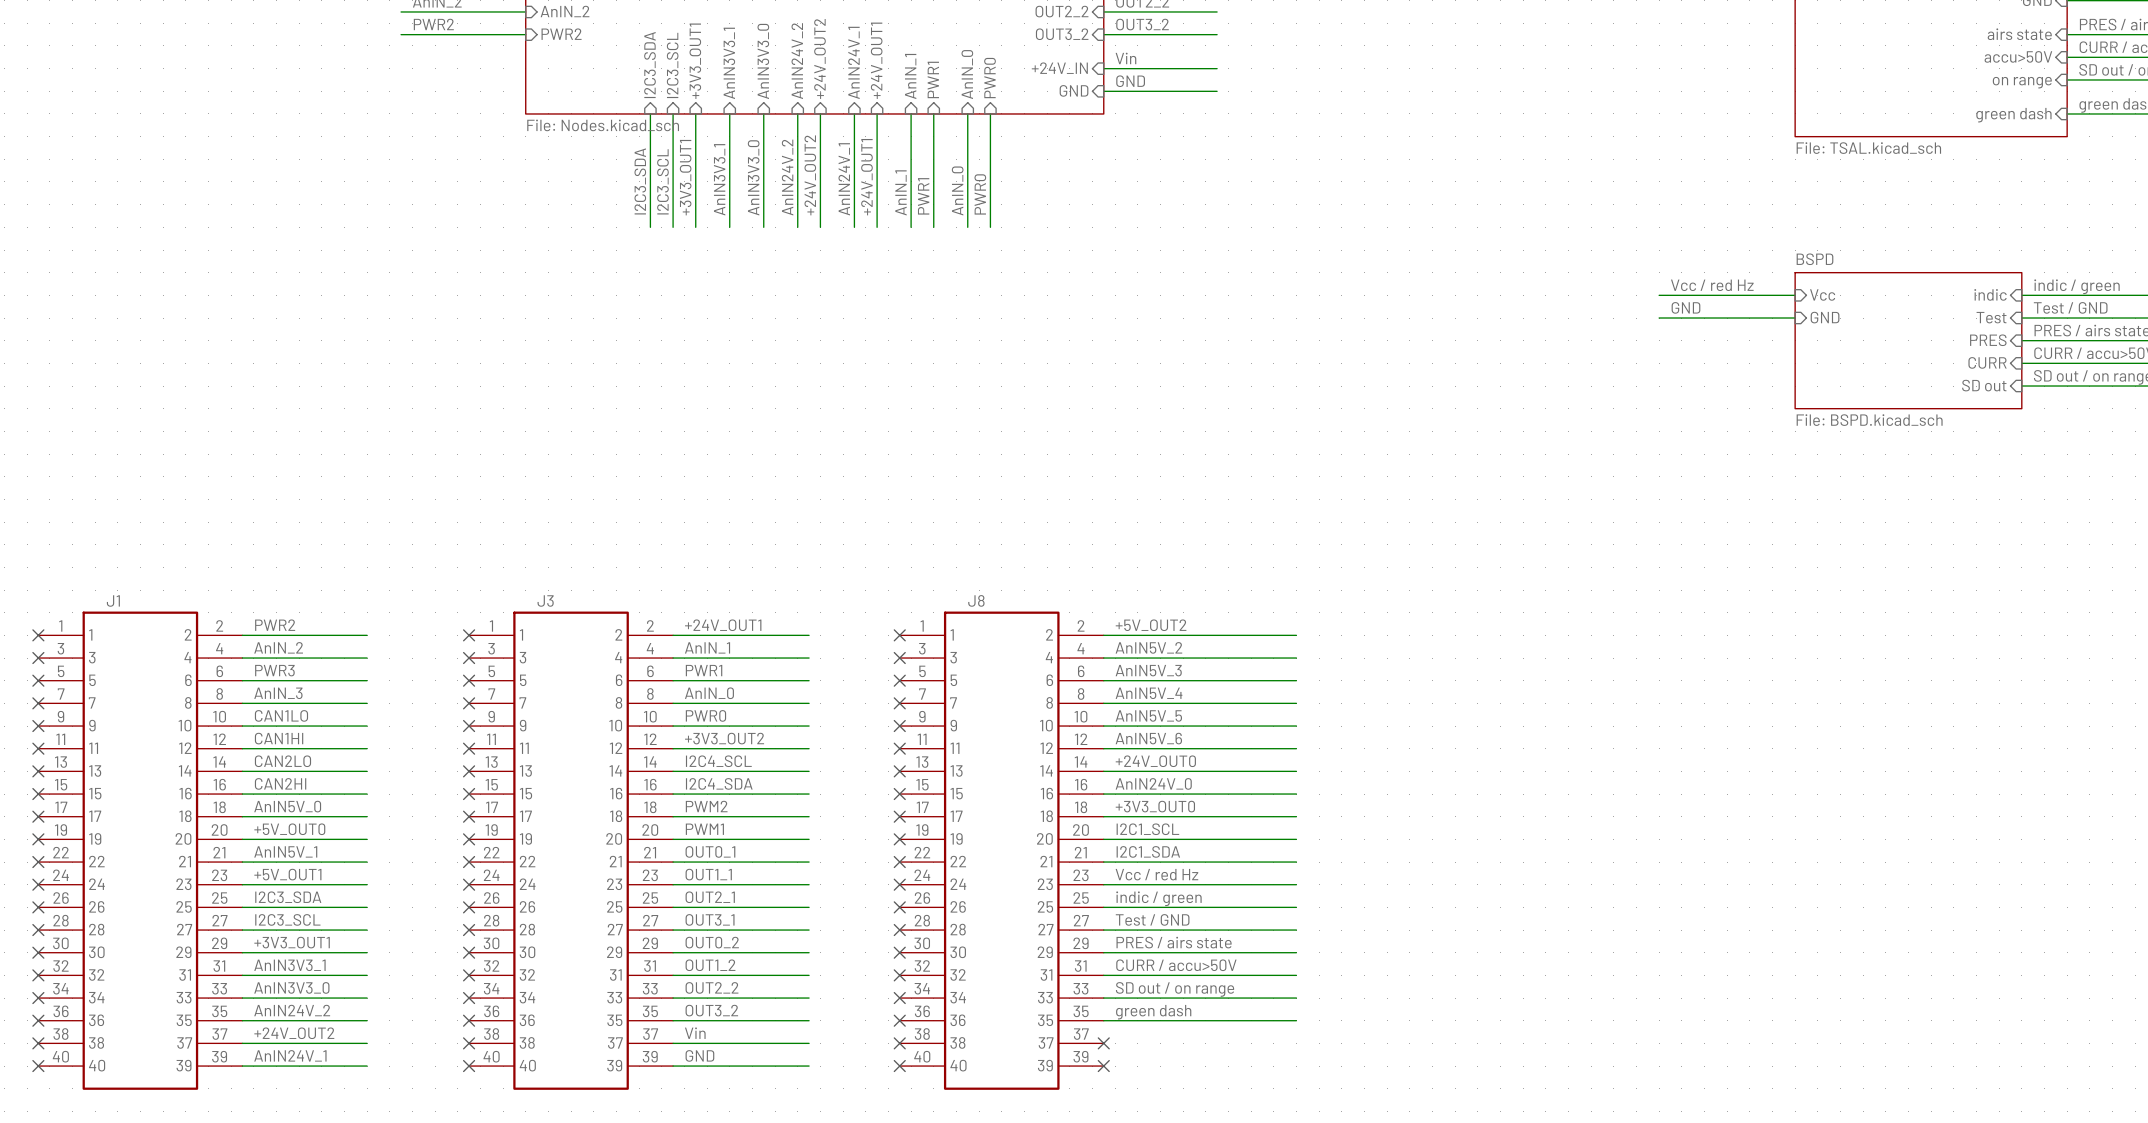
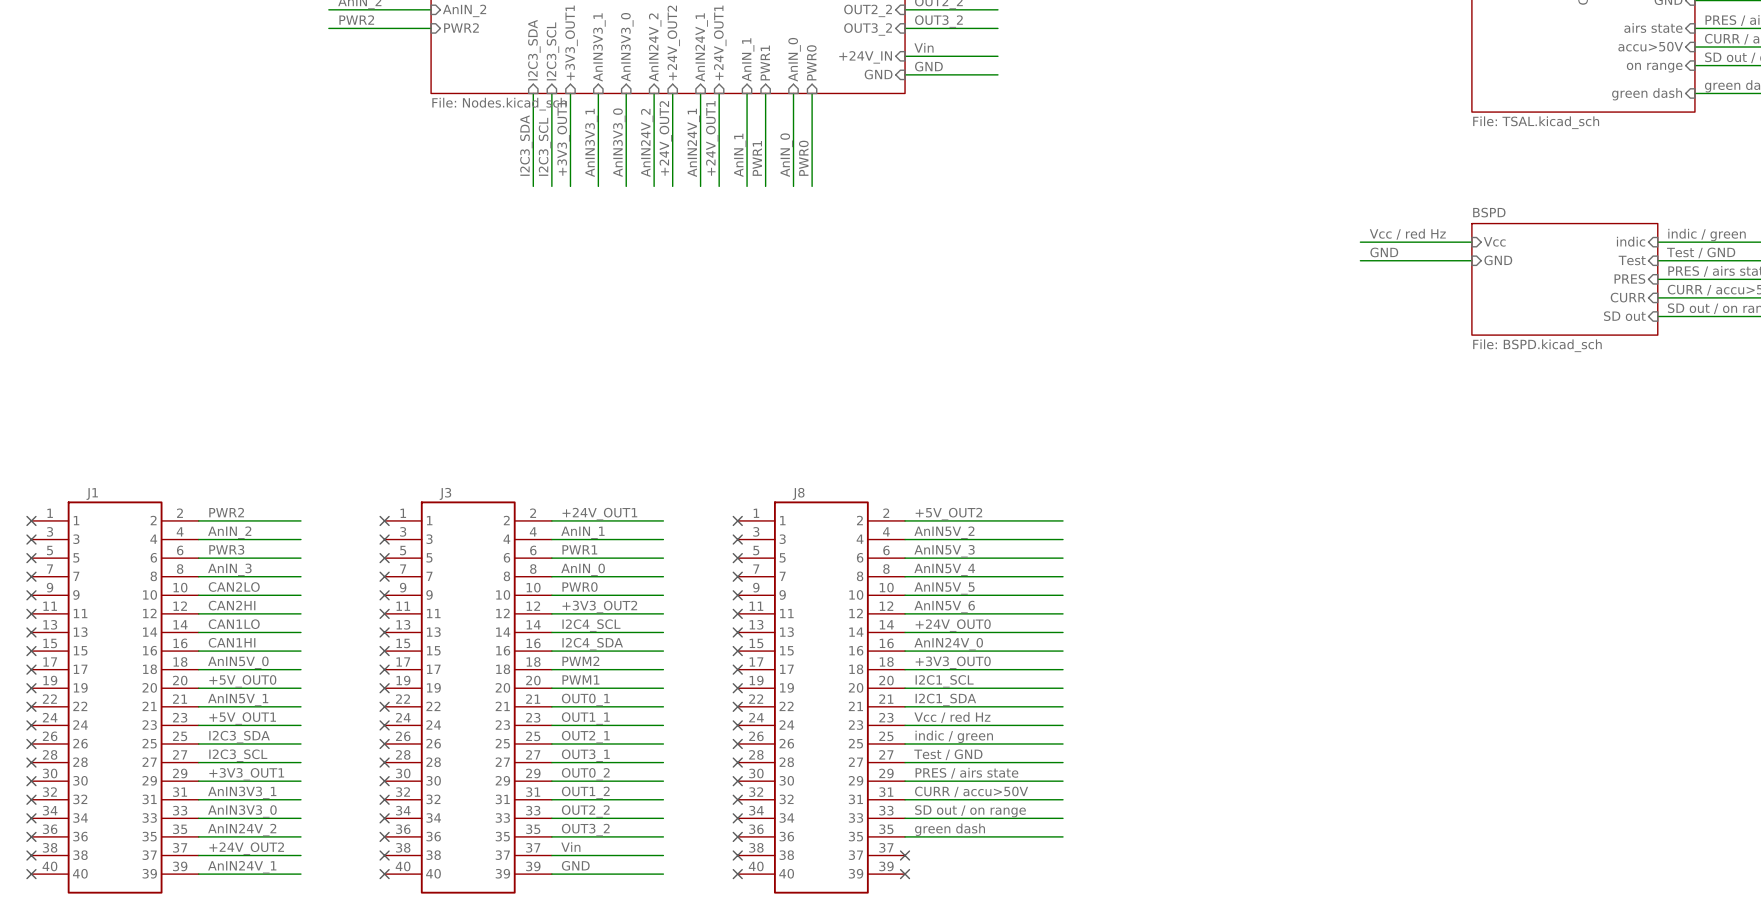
label: CAN1LO (281, 715) -> CAN2LO (234, 587)
label: CAN1HI (279, 738) -> CAN2HI (232, 605)
label: CAN2LO (282, 761) -> CAN1LO (234, 624)
label: CAN2HI (280, 783) -> CAN1HI (232, 642)

